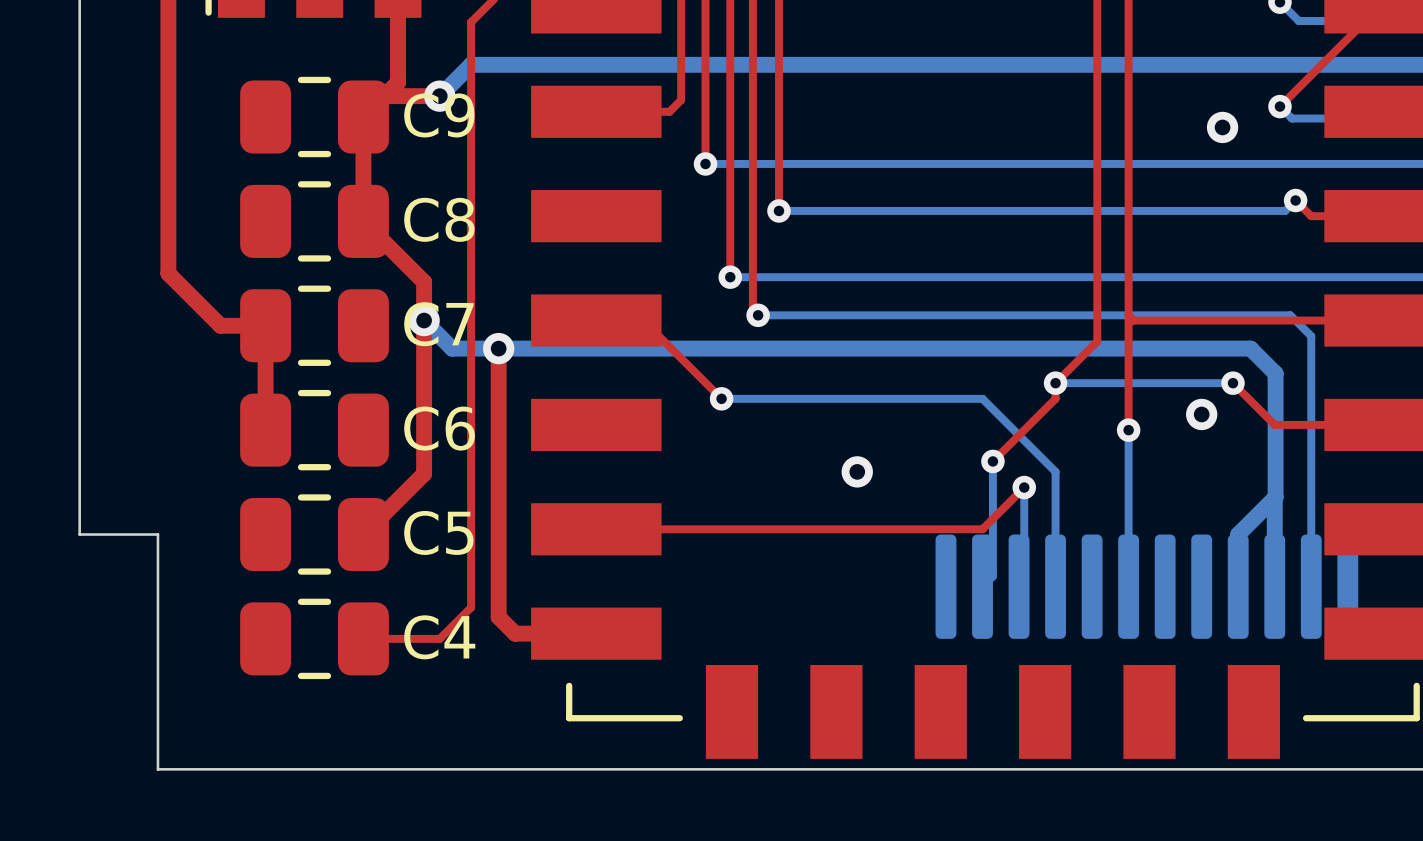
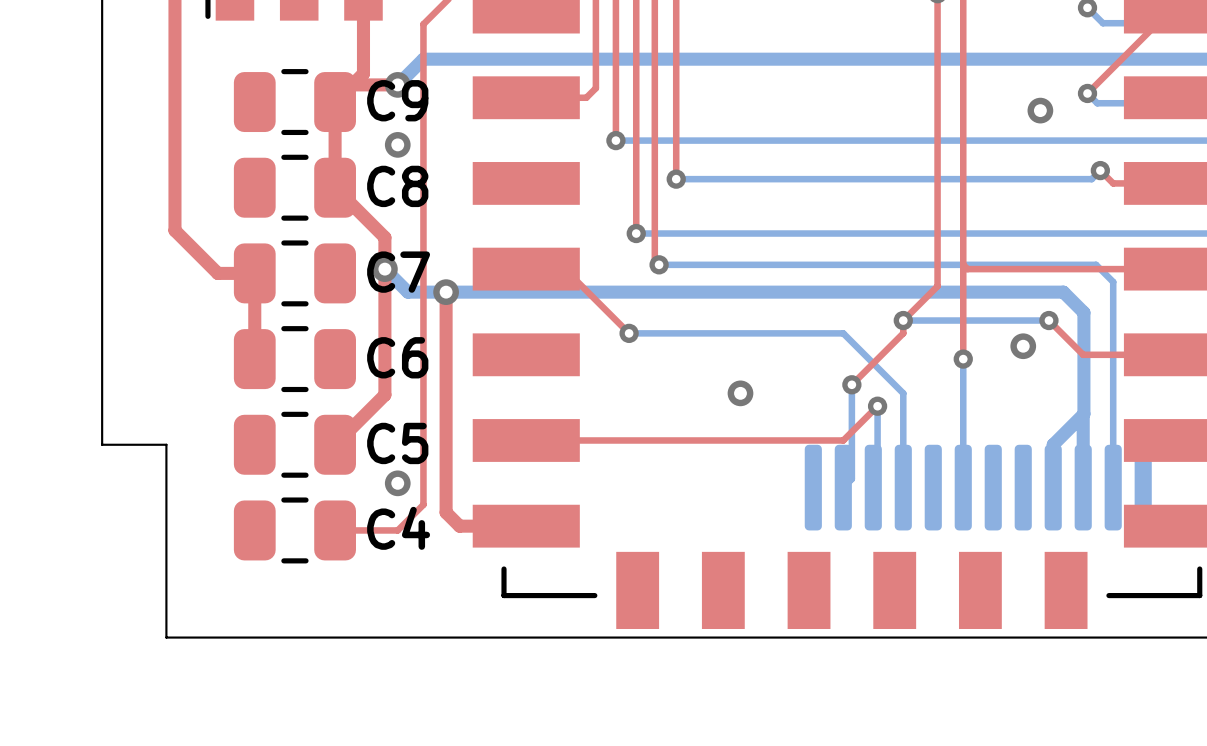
via: none -> (397, 144)
via: none -> (397, 483)

